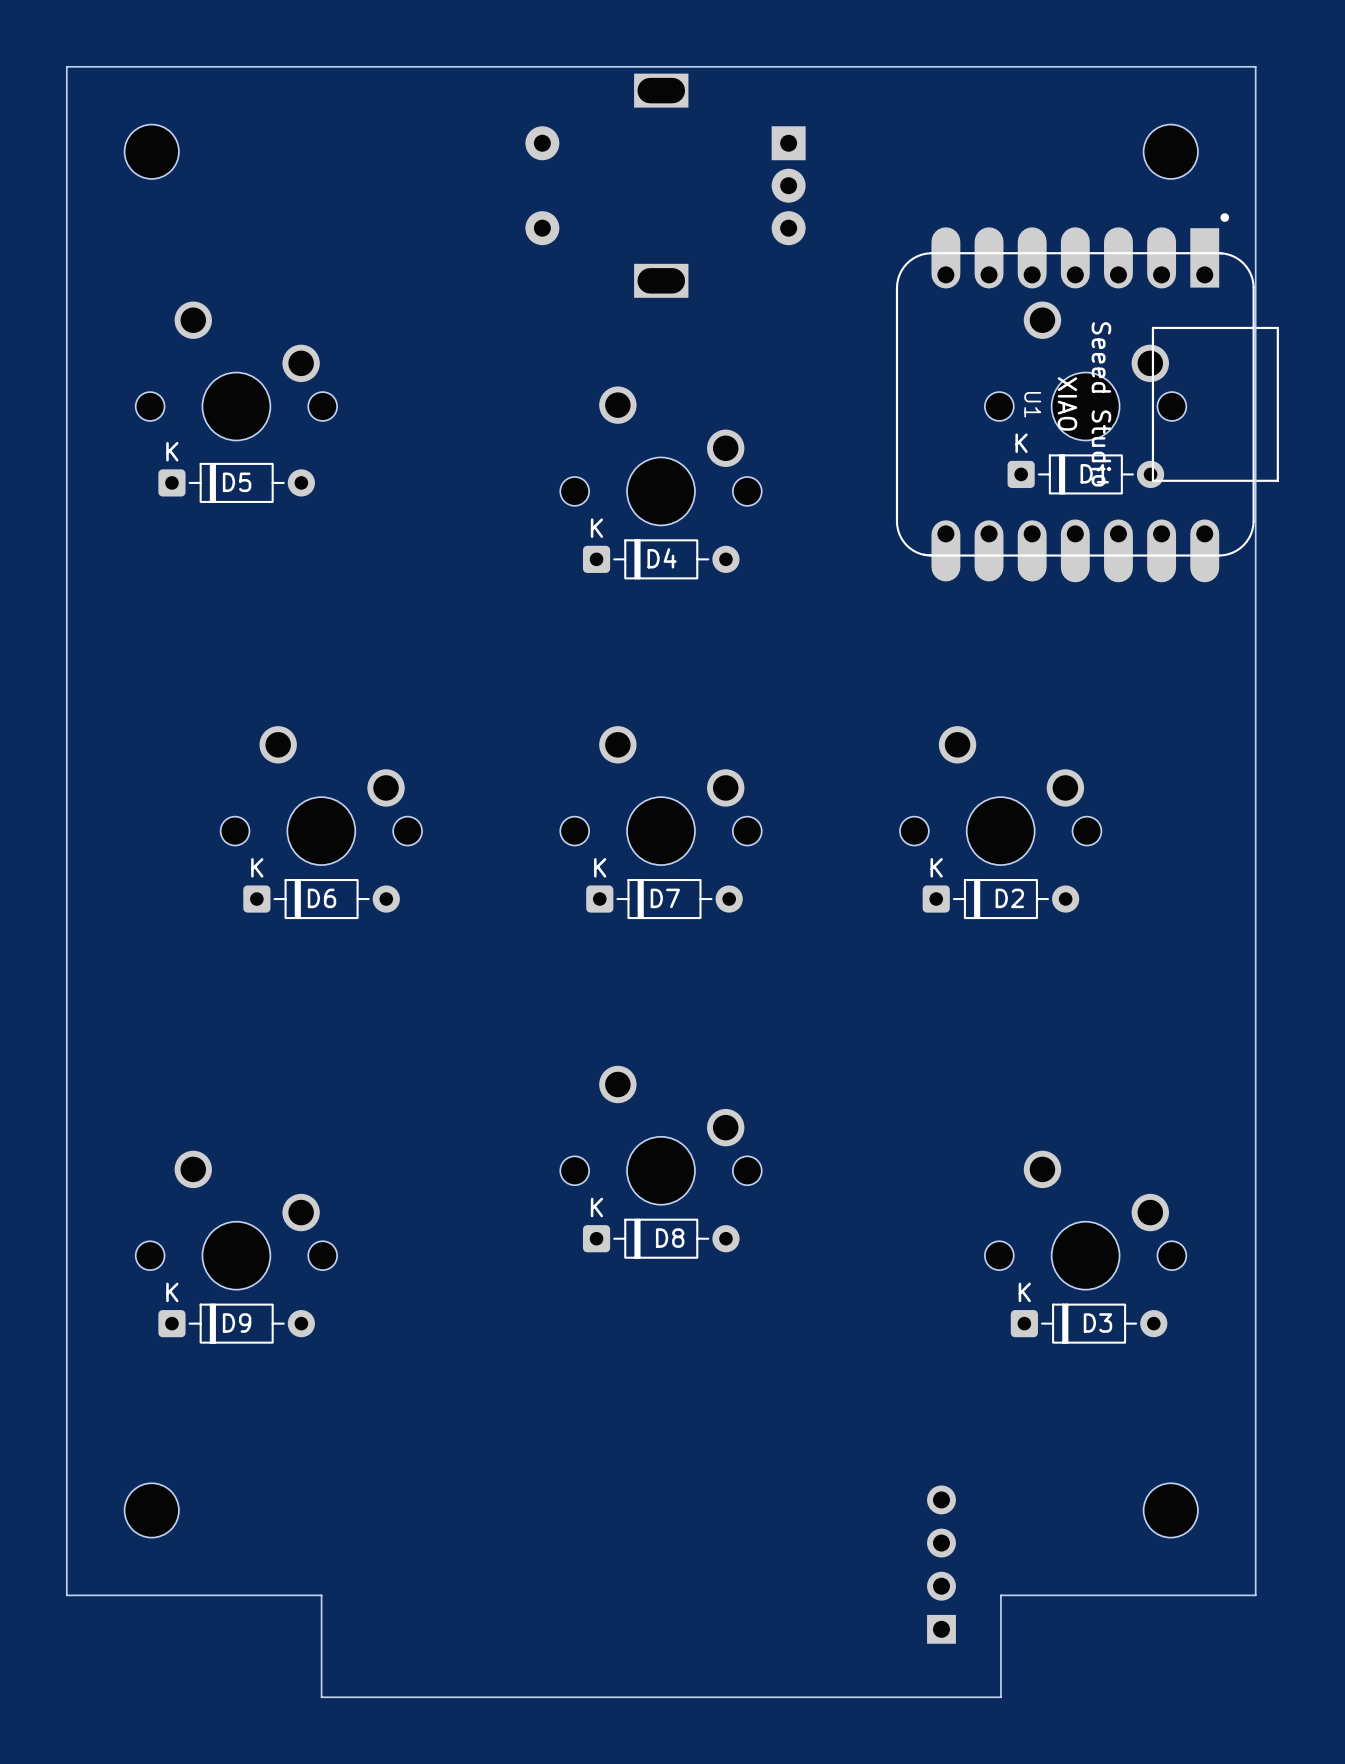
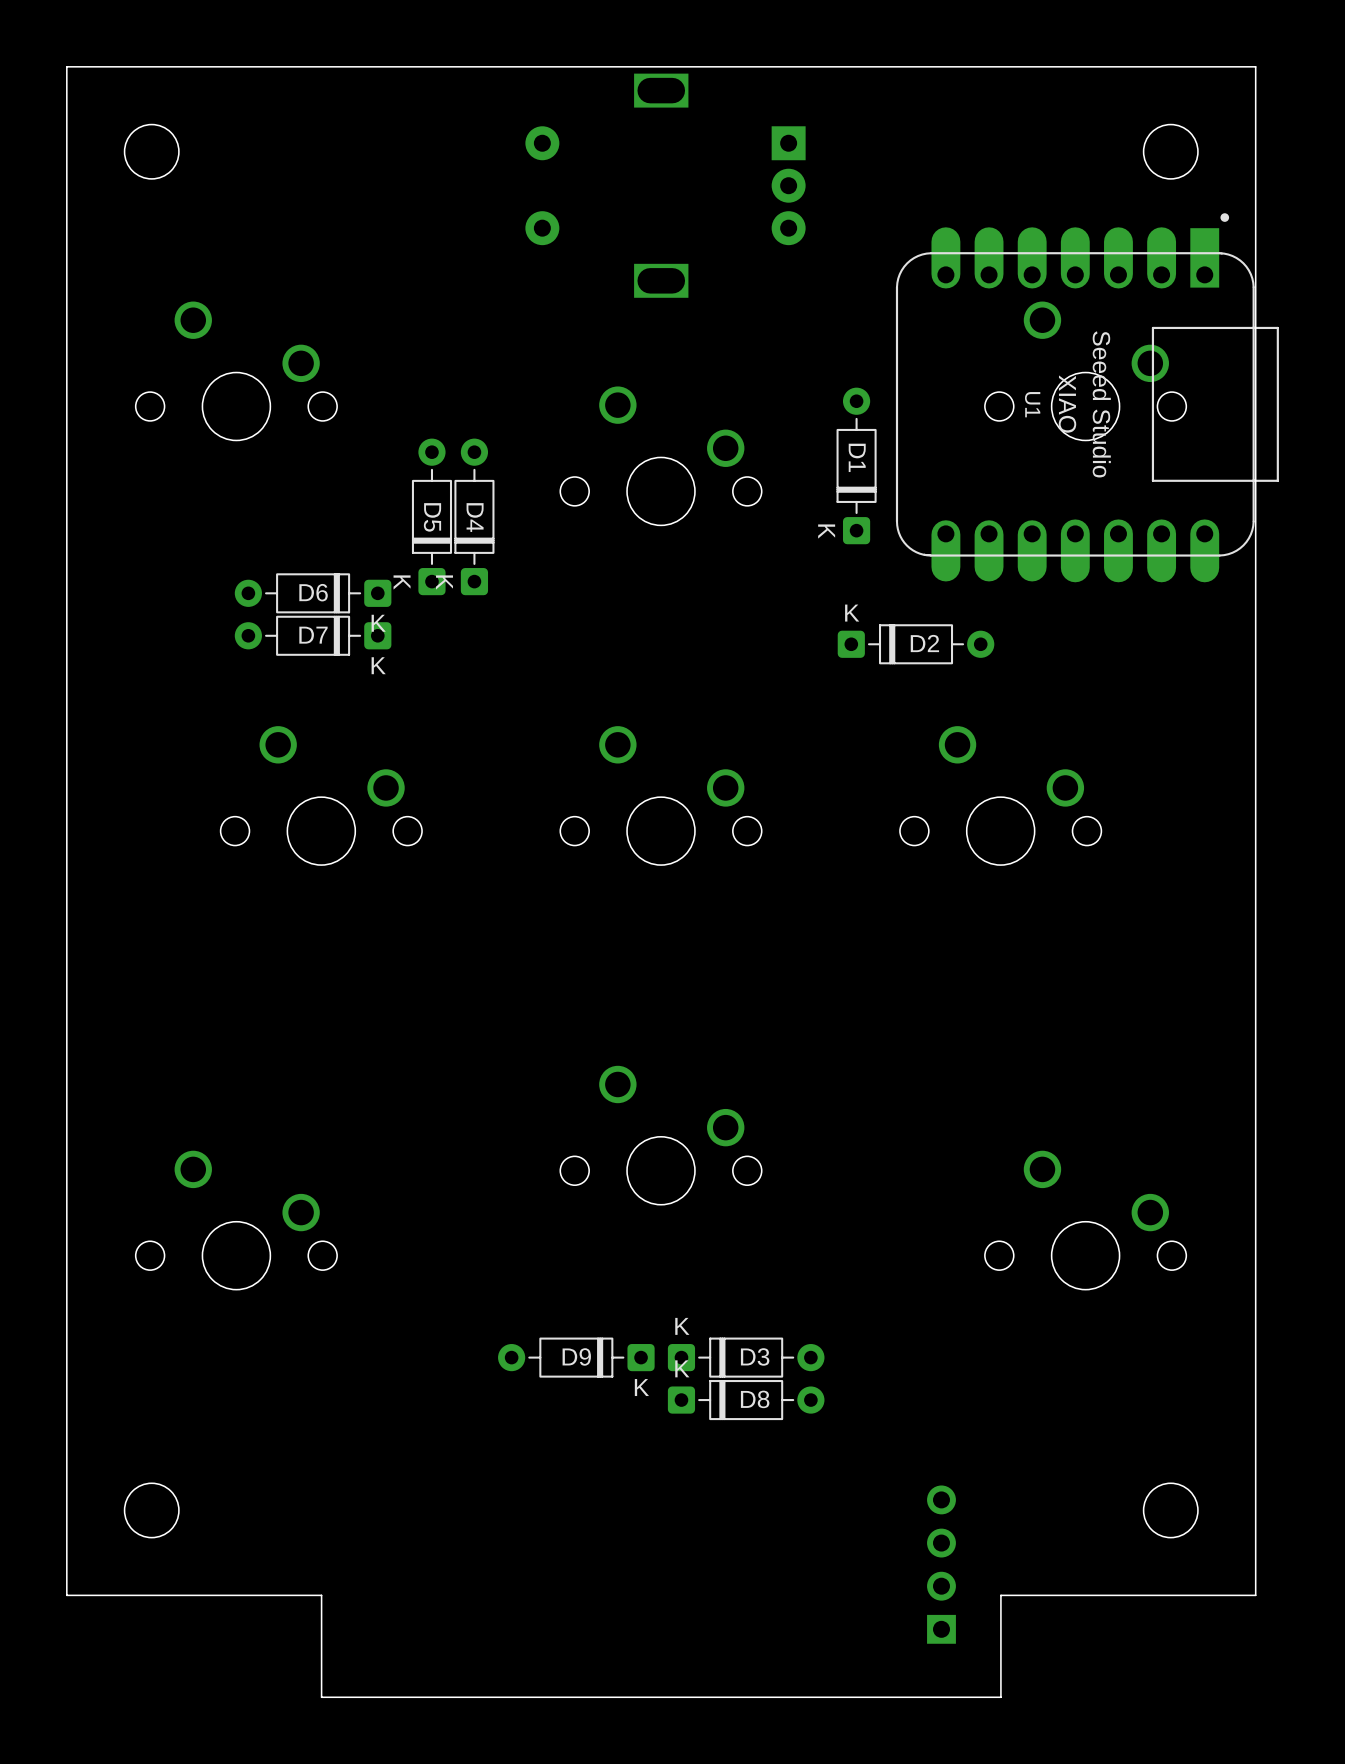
D1 rotation: 0° (1085, 474) -> 90° counterclockwise (856, 465)
D1 position: (1085, 474) -> (856, 465)
D5 rotation: 0° (236, 482) -> 90° counterclockwise (431, 516)
D5 position: (236, 482) -> (431, 516)
D4 rotation: 0° (661, 559) -> 90° counterclockwise (474, 516)
D4 position: (661, 559) -> (474, 516)
D6 rotation: 0° (321, 899) -> 180° (313, 593)
D6 position: (321, 899) -> (313, 593)
D7 rotation: 0° (664, 899) -> 180° (313, 635)
D7 position: (664, 899) -> (313, 635)
D2 position: (1000, 899) -> (916, 644)
D8 position: (661, 1238) -> (746, 1400)
D9 rotation: 0° (236, 1323) -> 180° (576, 1357)
D9 position: (236, 1323) -> (576, 1357)
D3 position: (1089, 1323) -> (746, 1357)

